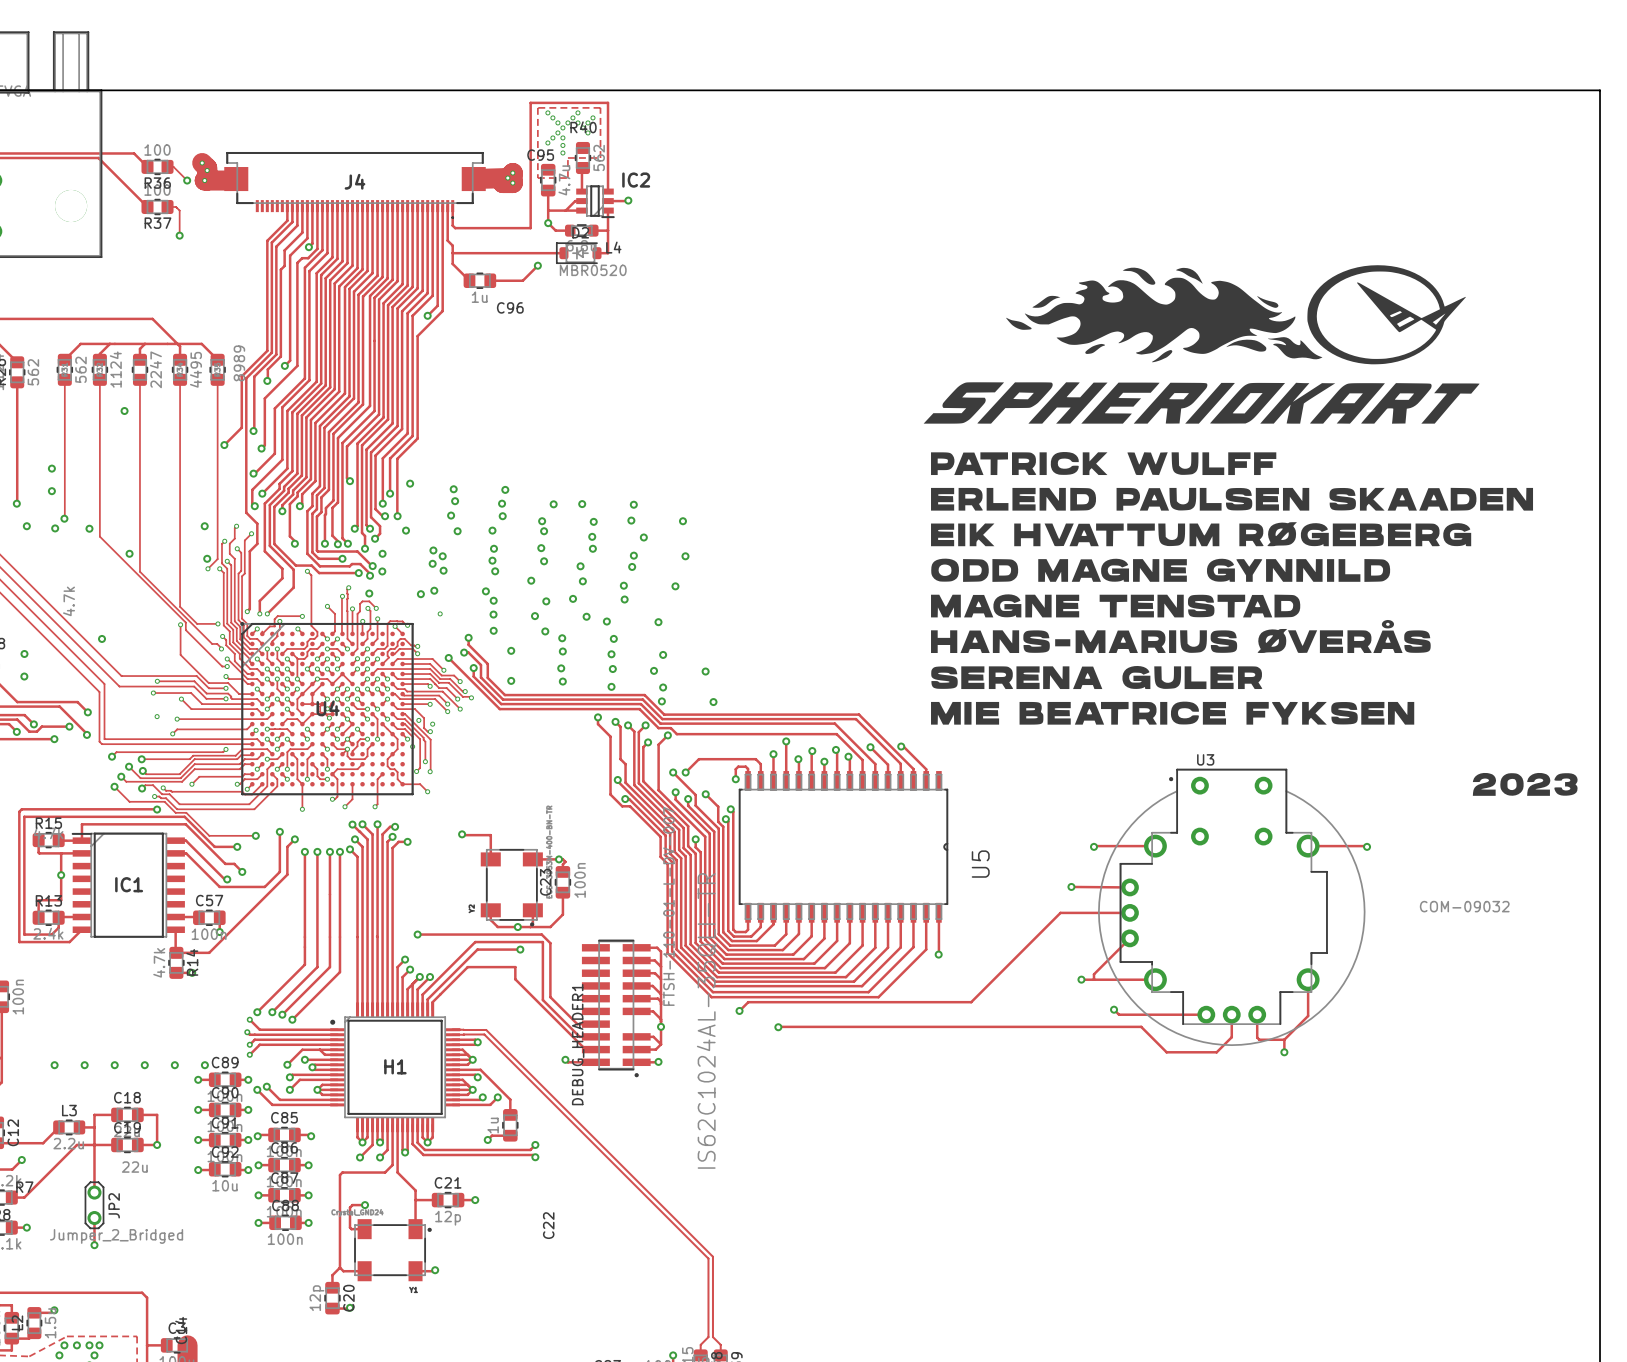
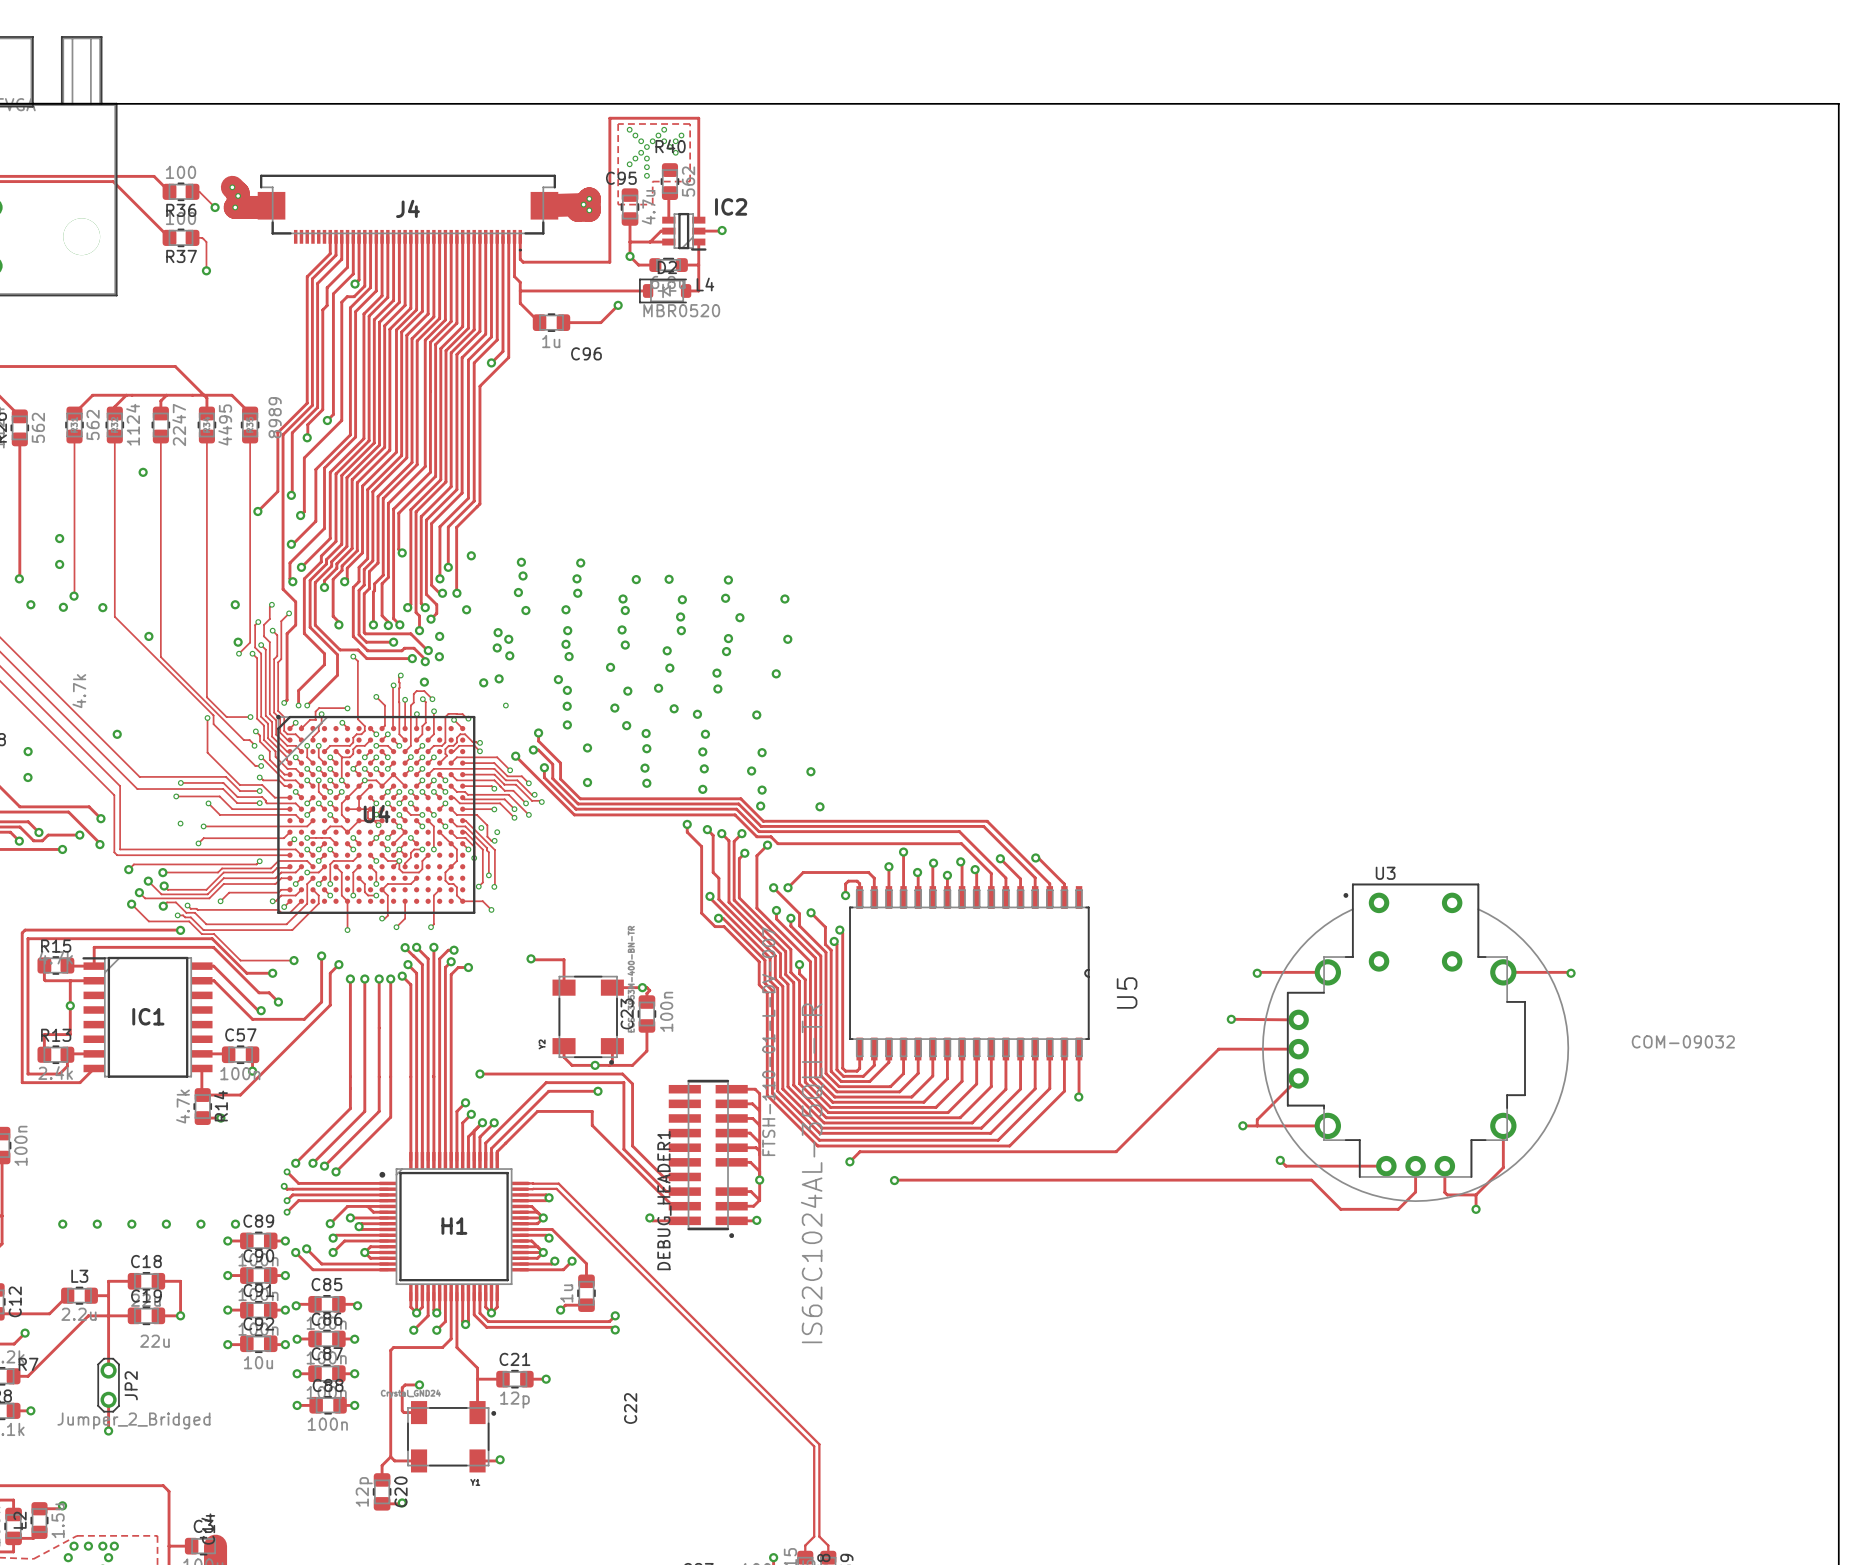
drawing: [923, 265, 1480, 424] -> none
drawing: [931, 452, 1578, 796] -> none

